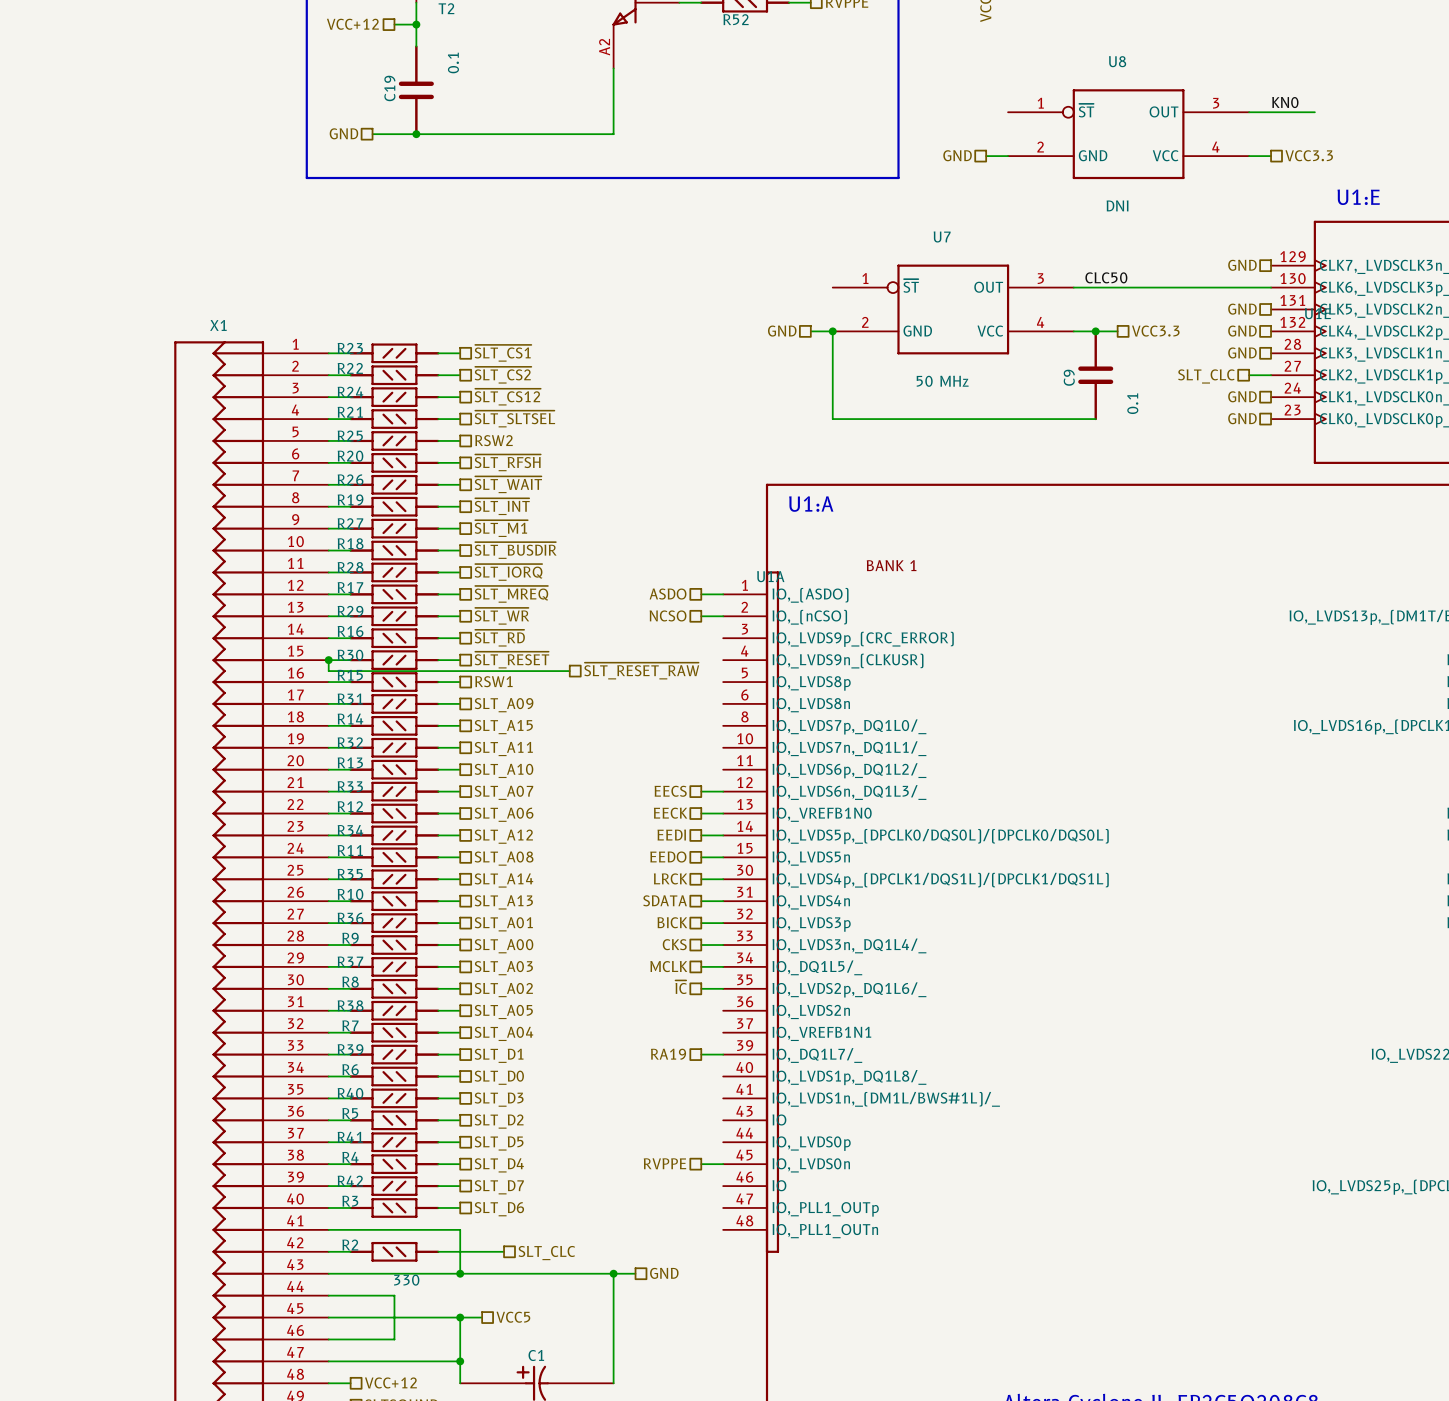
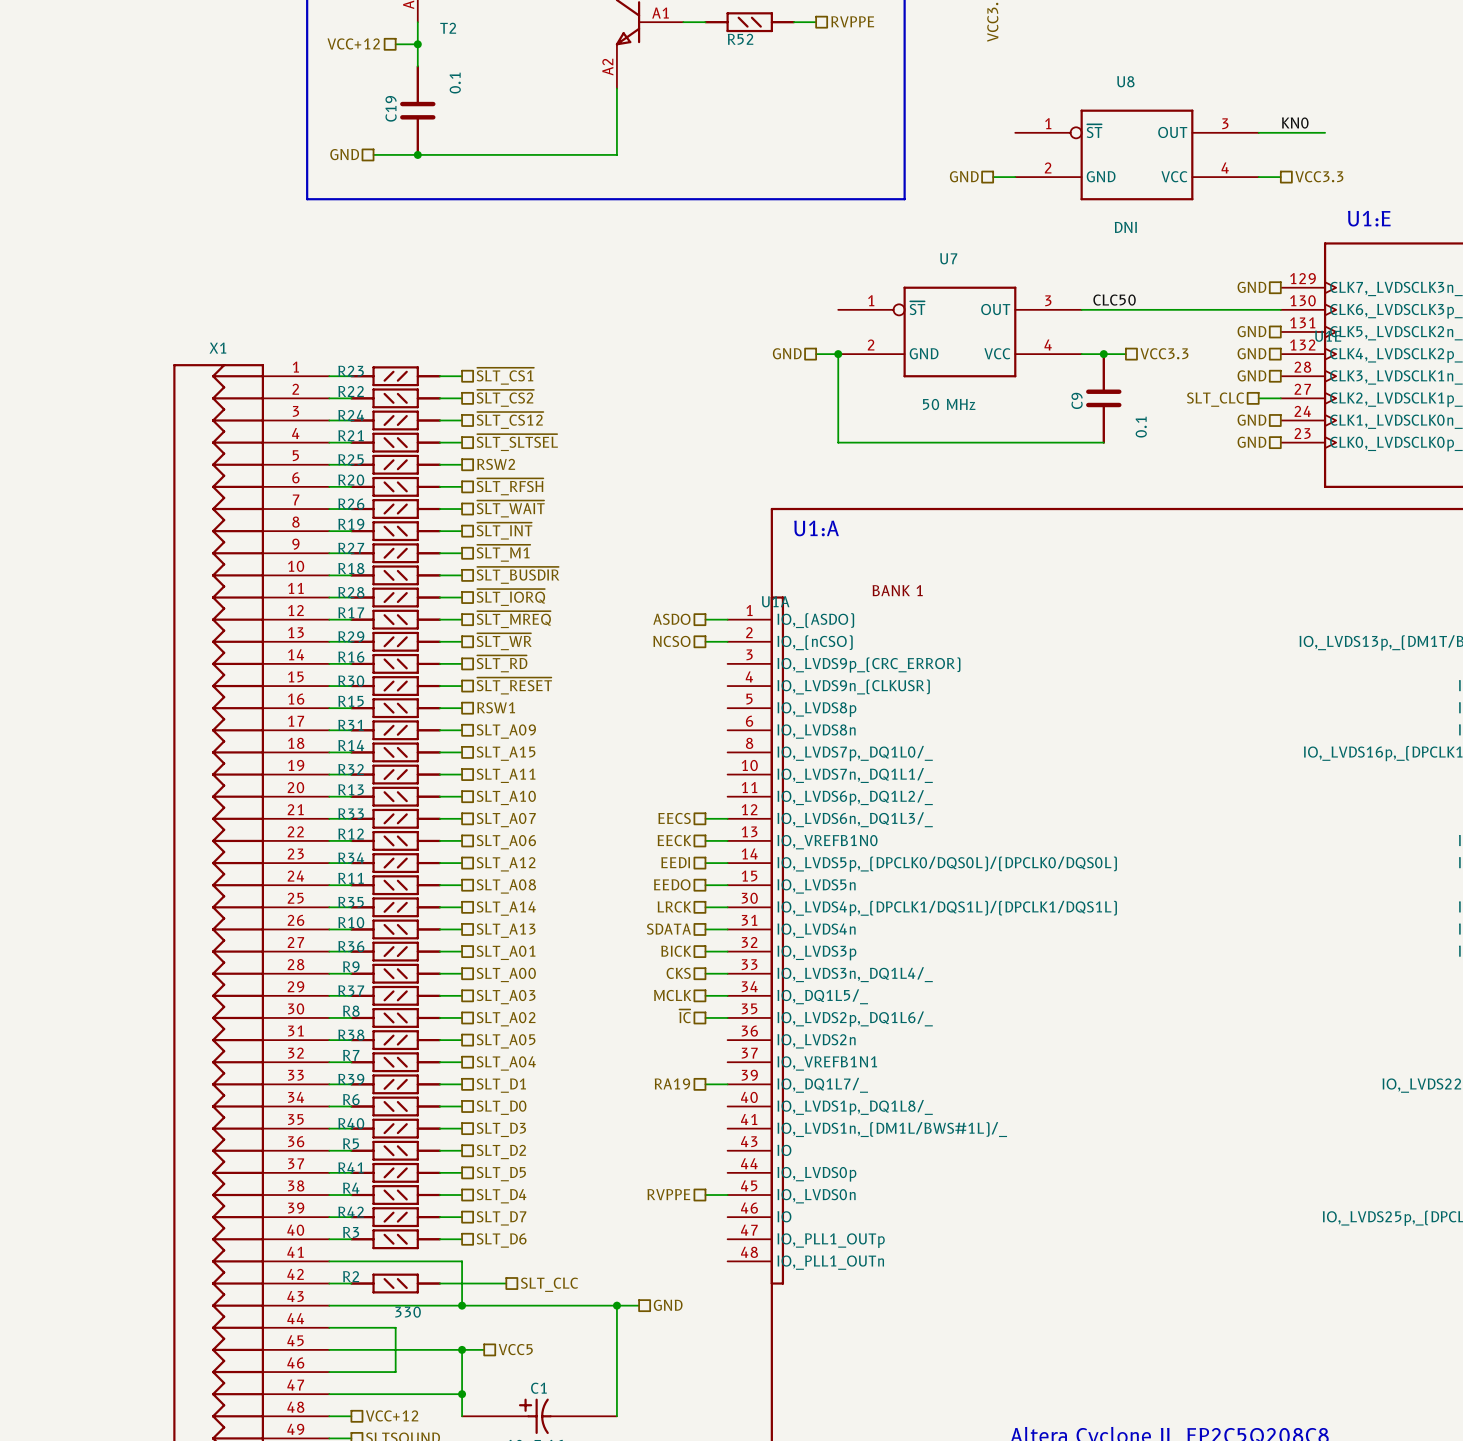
wire: (328, 660) (328, 671) (569, 671) -> none
junction: (328, 660) -> none
hierarchical label: ~{SLT_RESET_RAW} (641, 671) -> none

